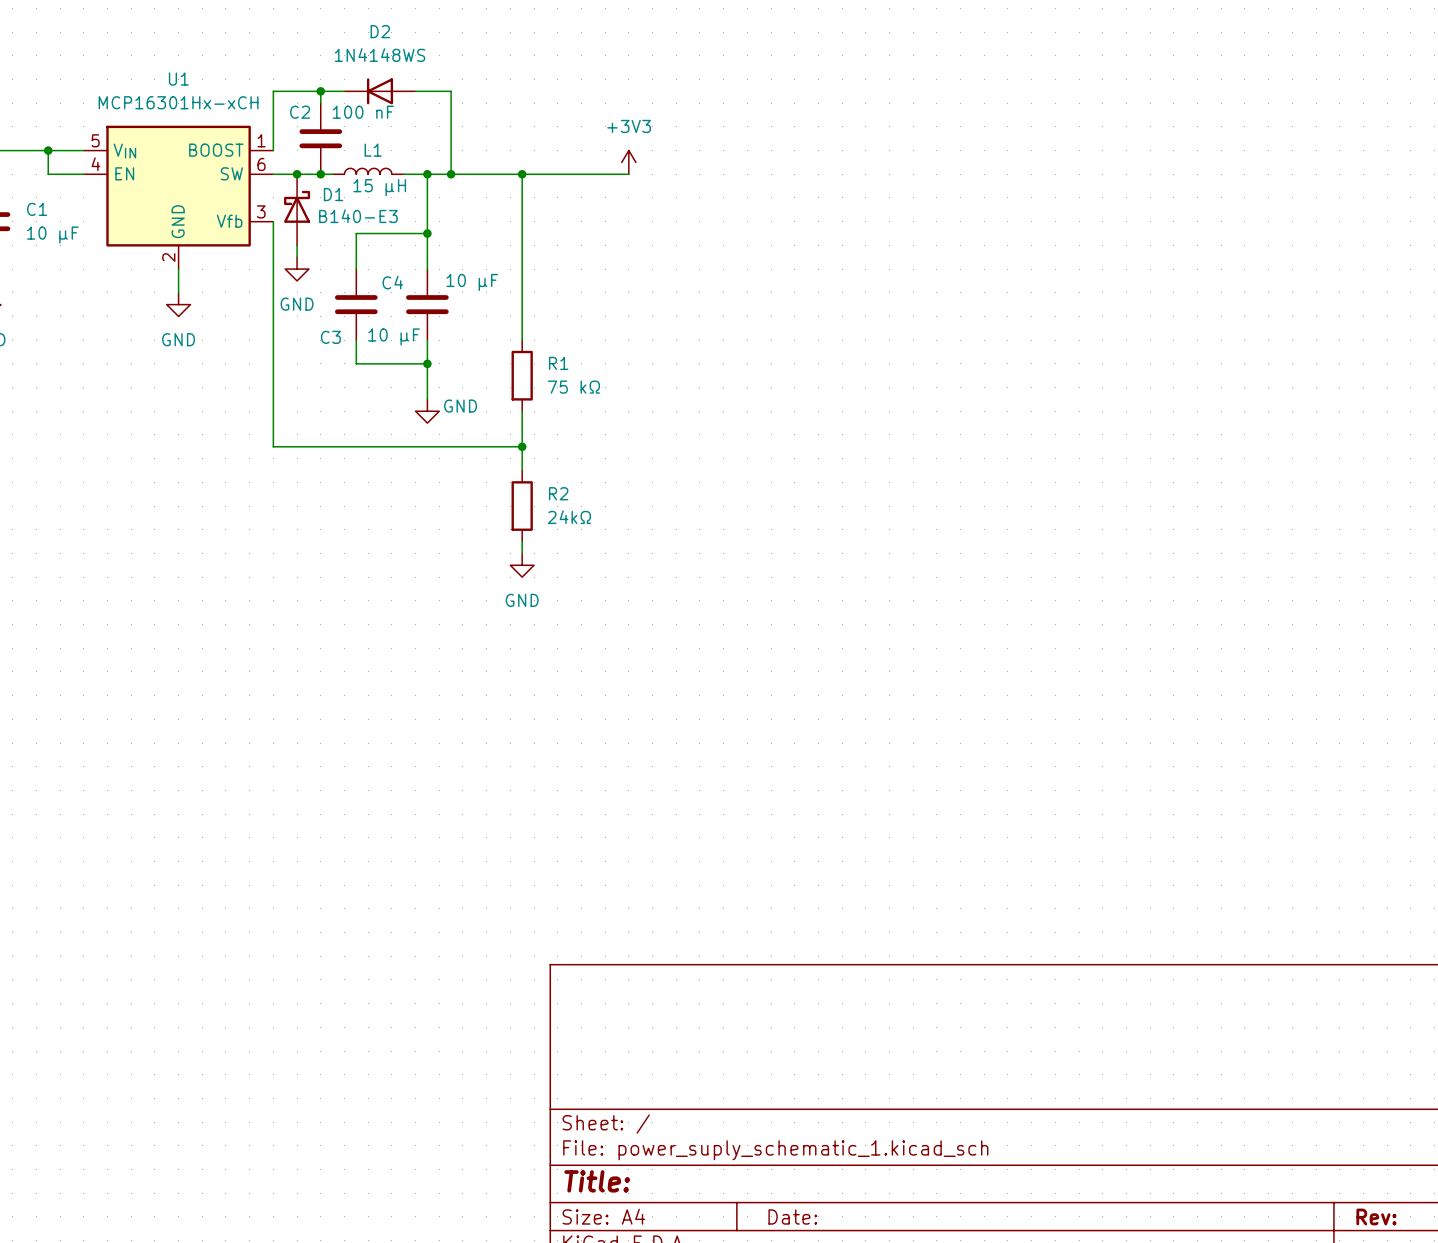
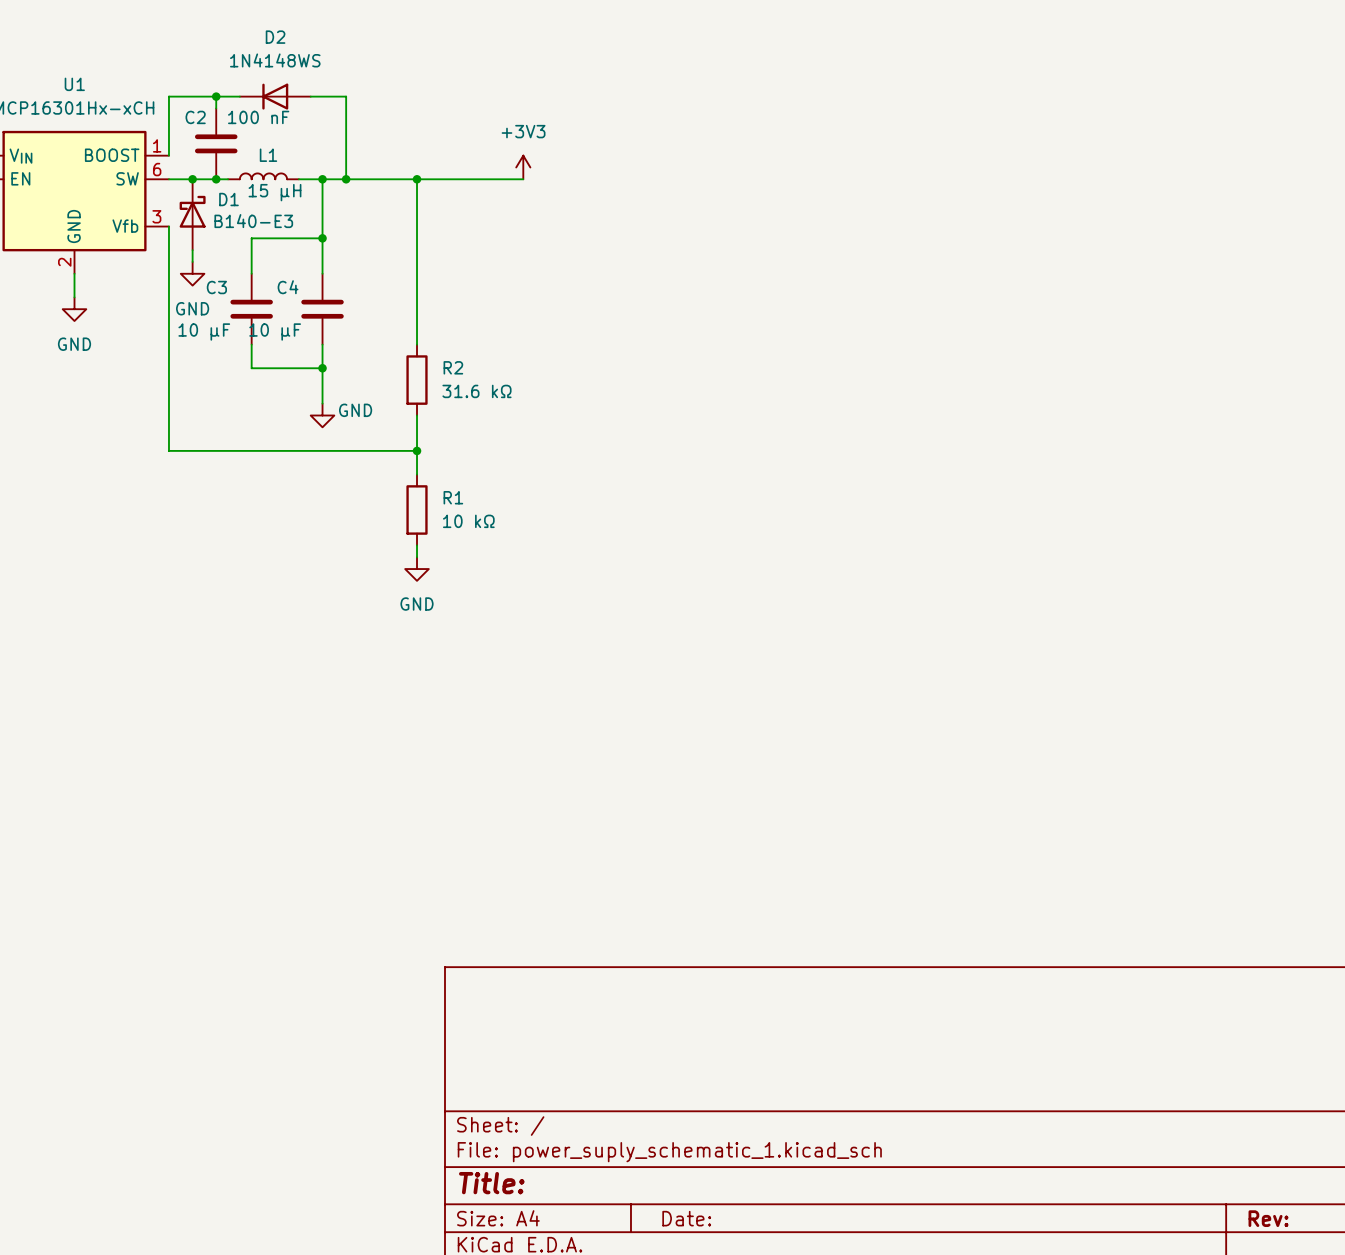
C4 value position: 10 µF (472, 282) -> 10 µF (275, 331)
C3 value position: 10 µF (394, 336) -> 10 µF (204, 331)
C3 name position: C3 (330, 337) -> C3 (216, 287)
R1 name: R1 (558, 363) -> R2 (453, 367)
R1 value: 75 kΩ (573, 387) -> 31.6 kΩ (476, 391)
R2 name: R2 (558, 493) -> R1 (453, 497)
R2 value: 24kΩ (569, 517) -> 10 kΩ (468, 521)

